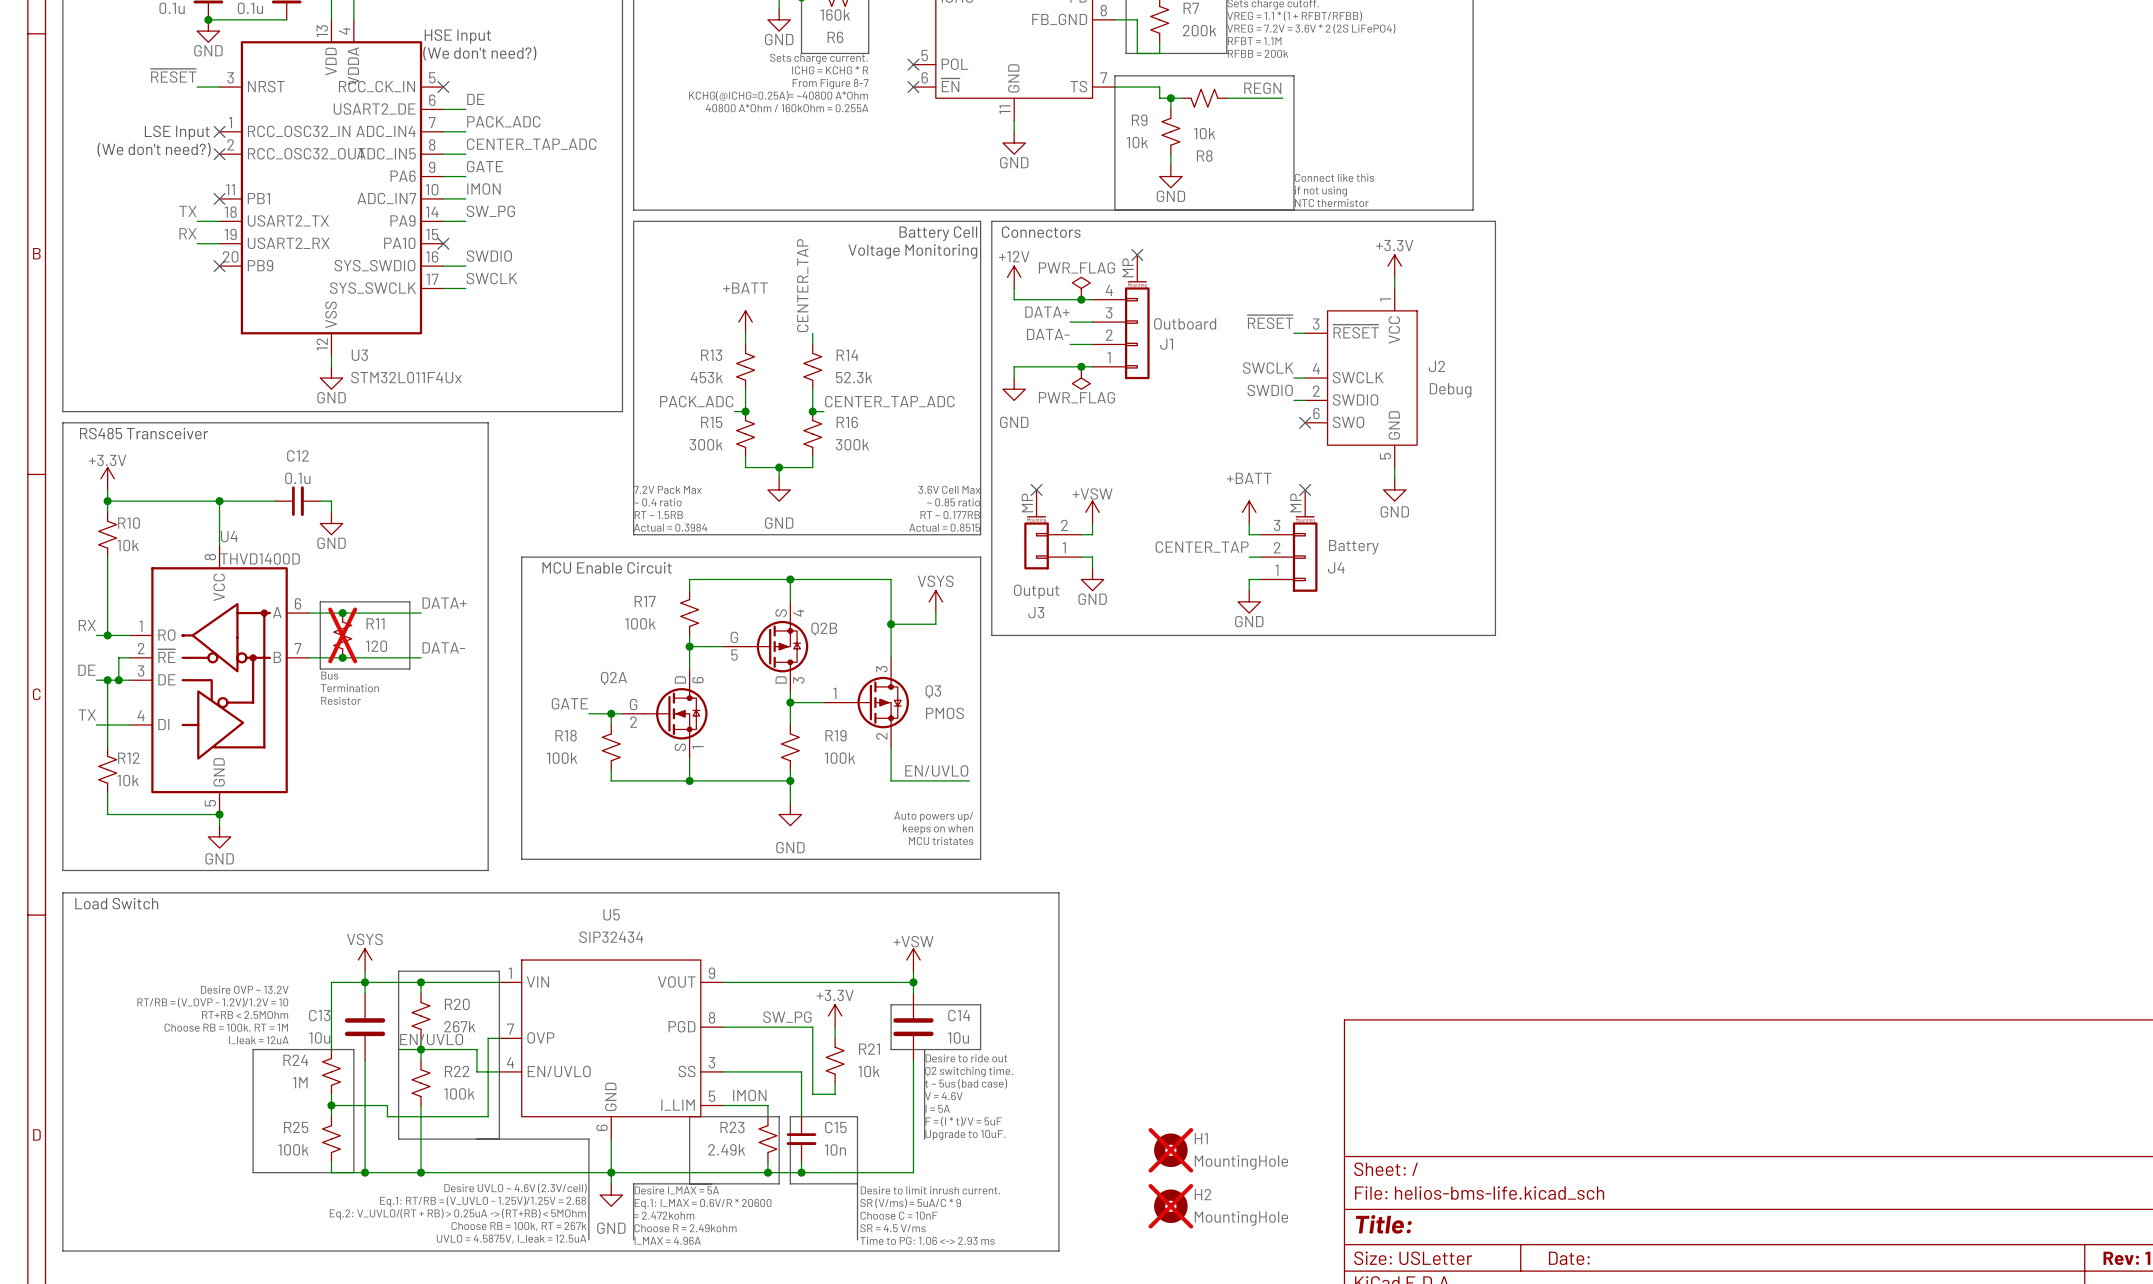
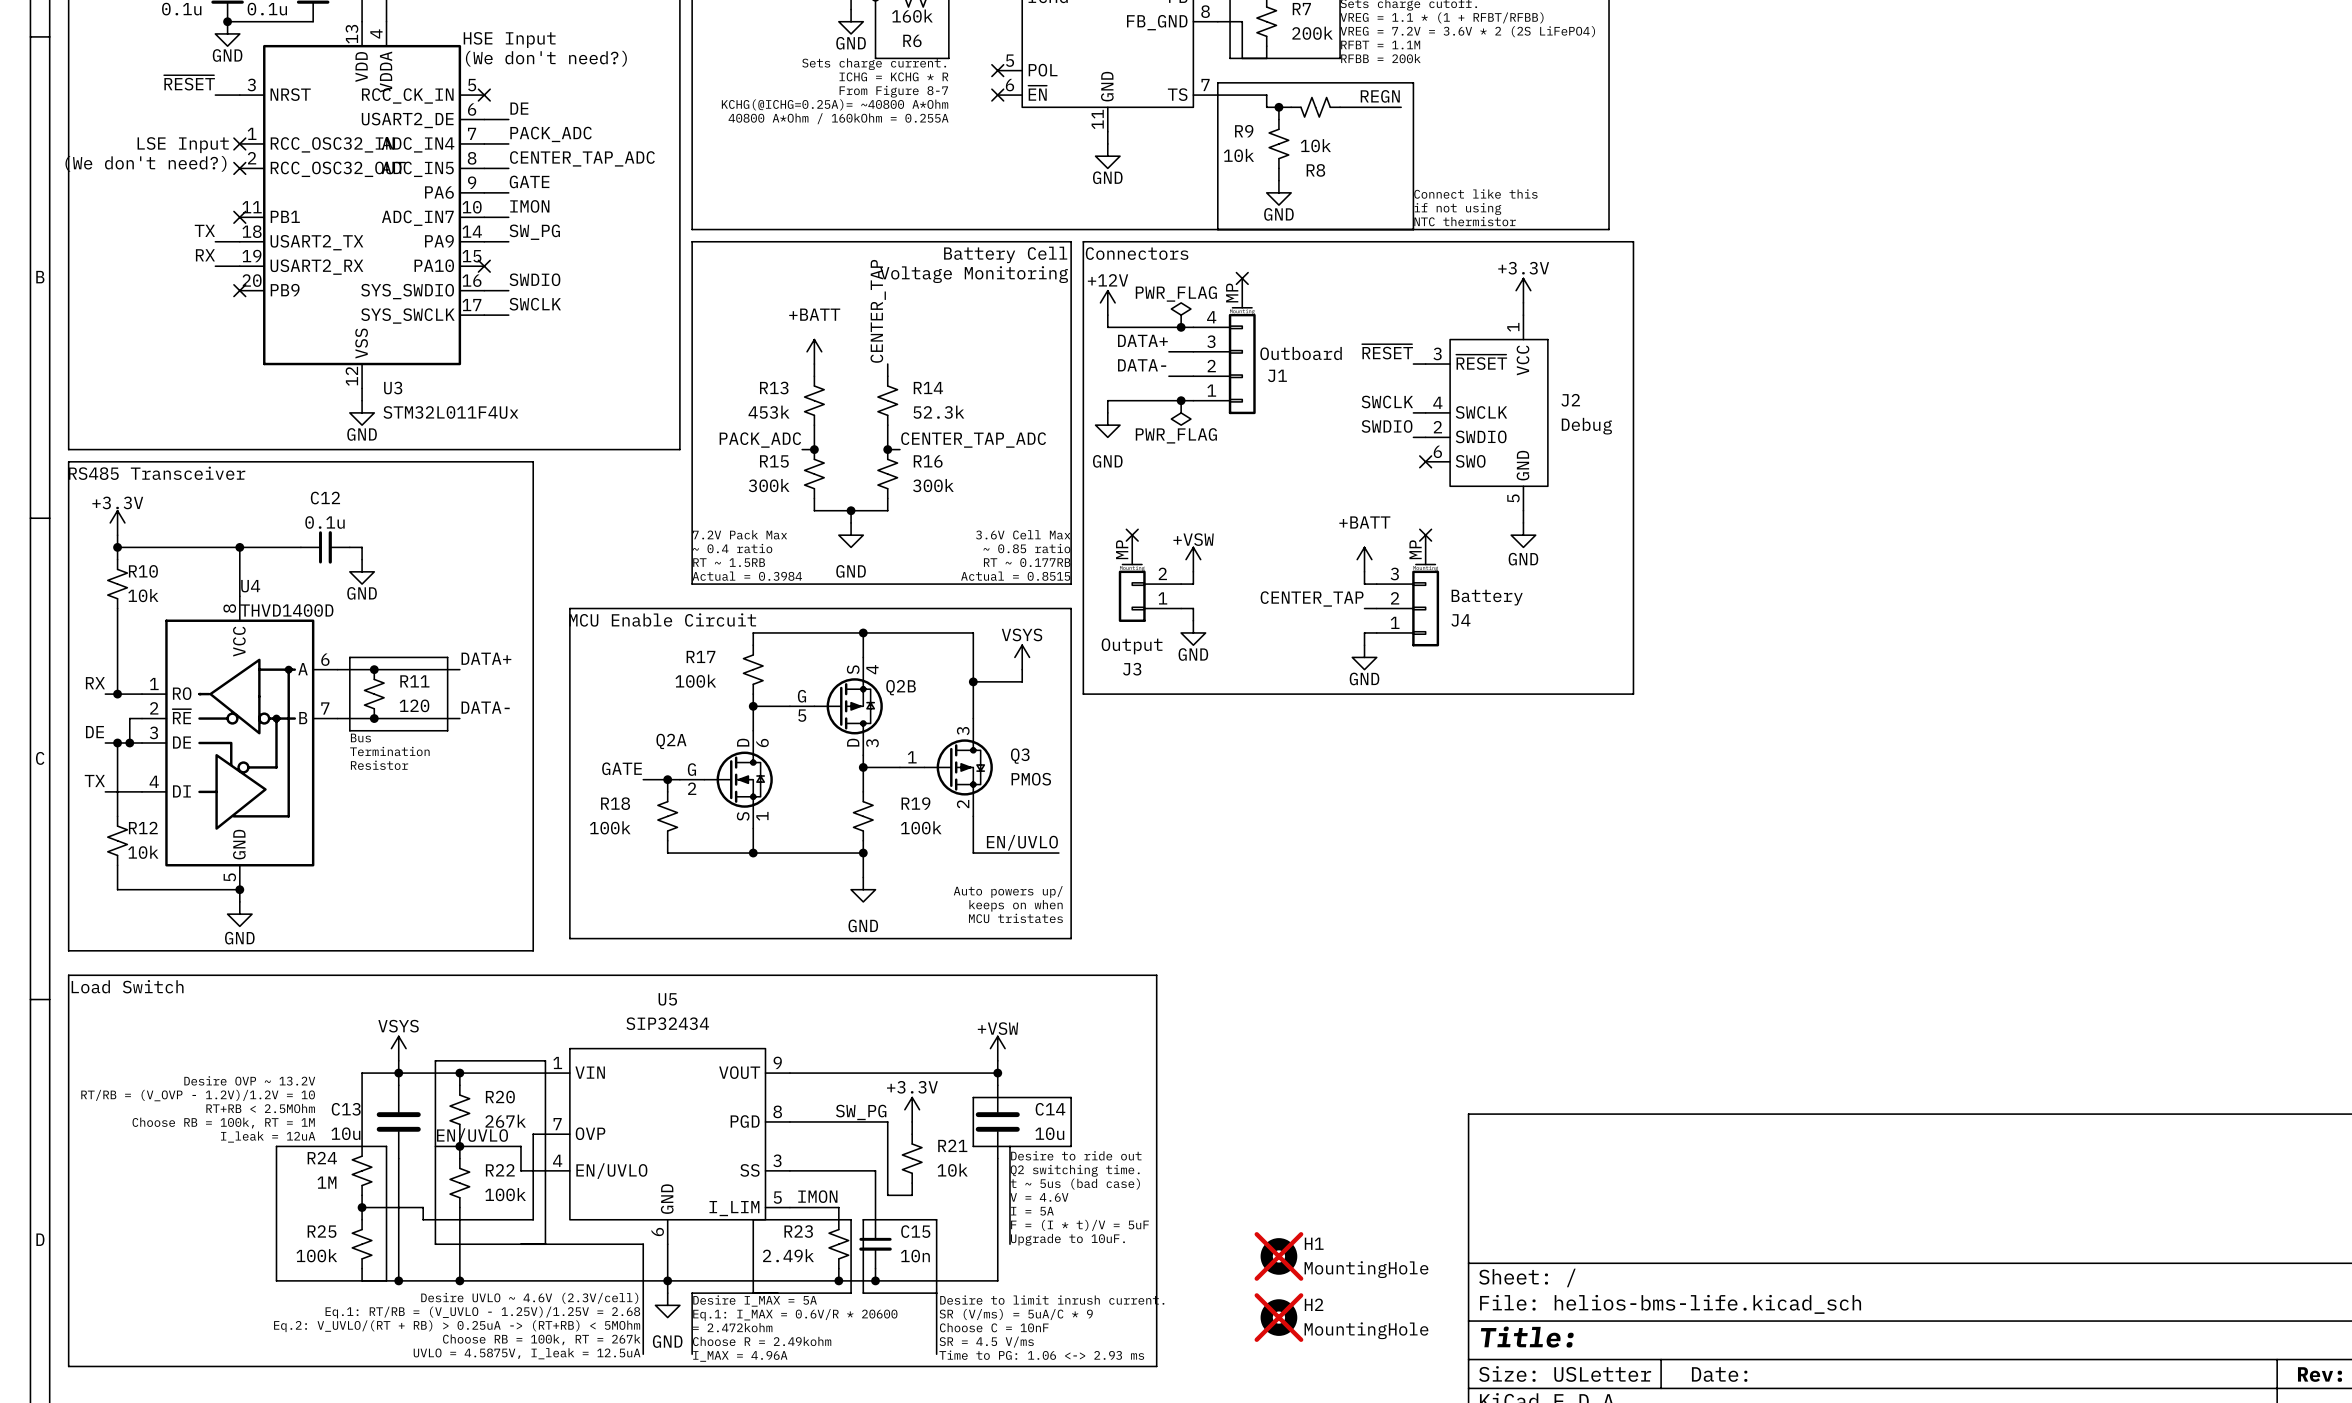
R11 do-not-place cross: (342, 635) -> none

